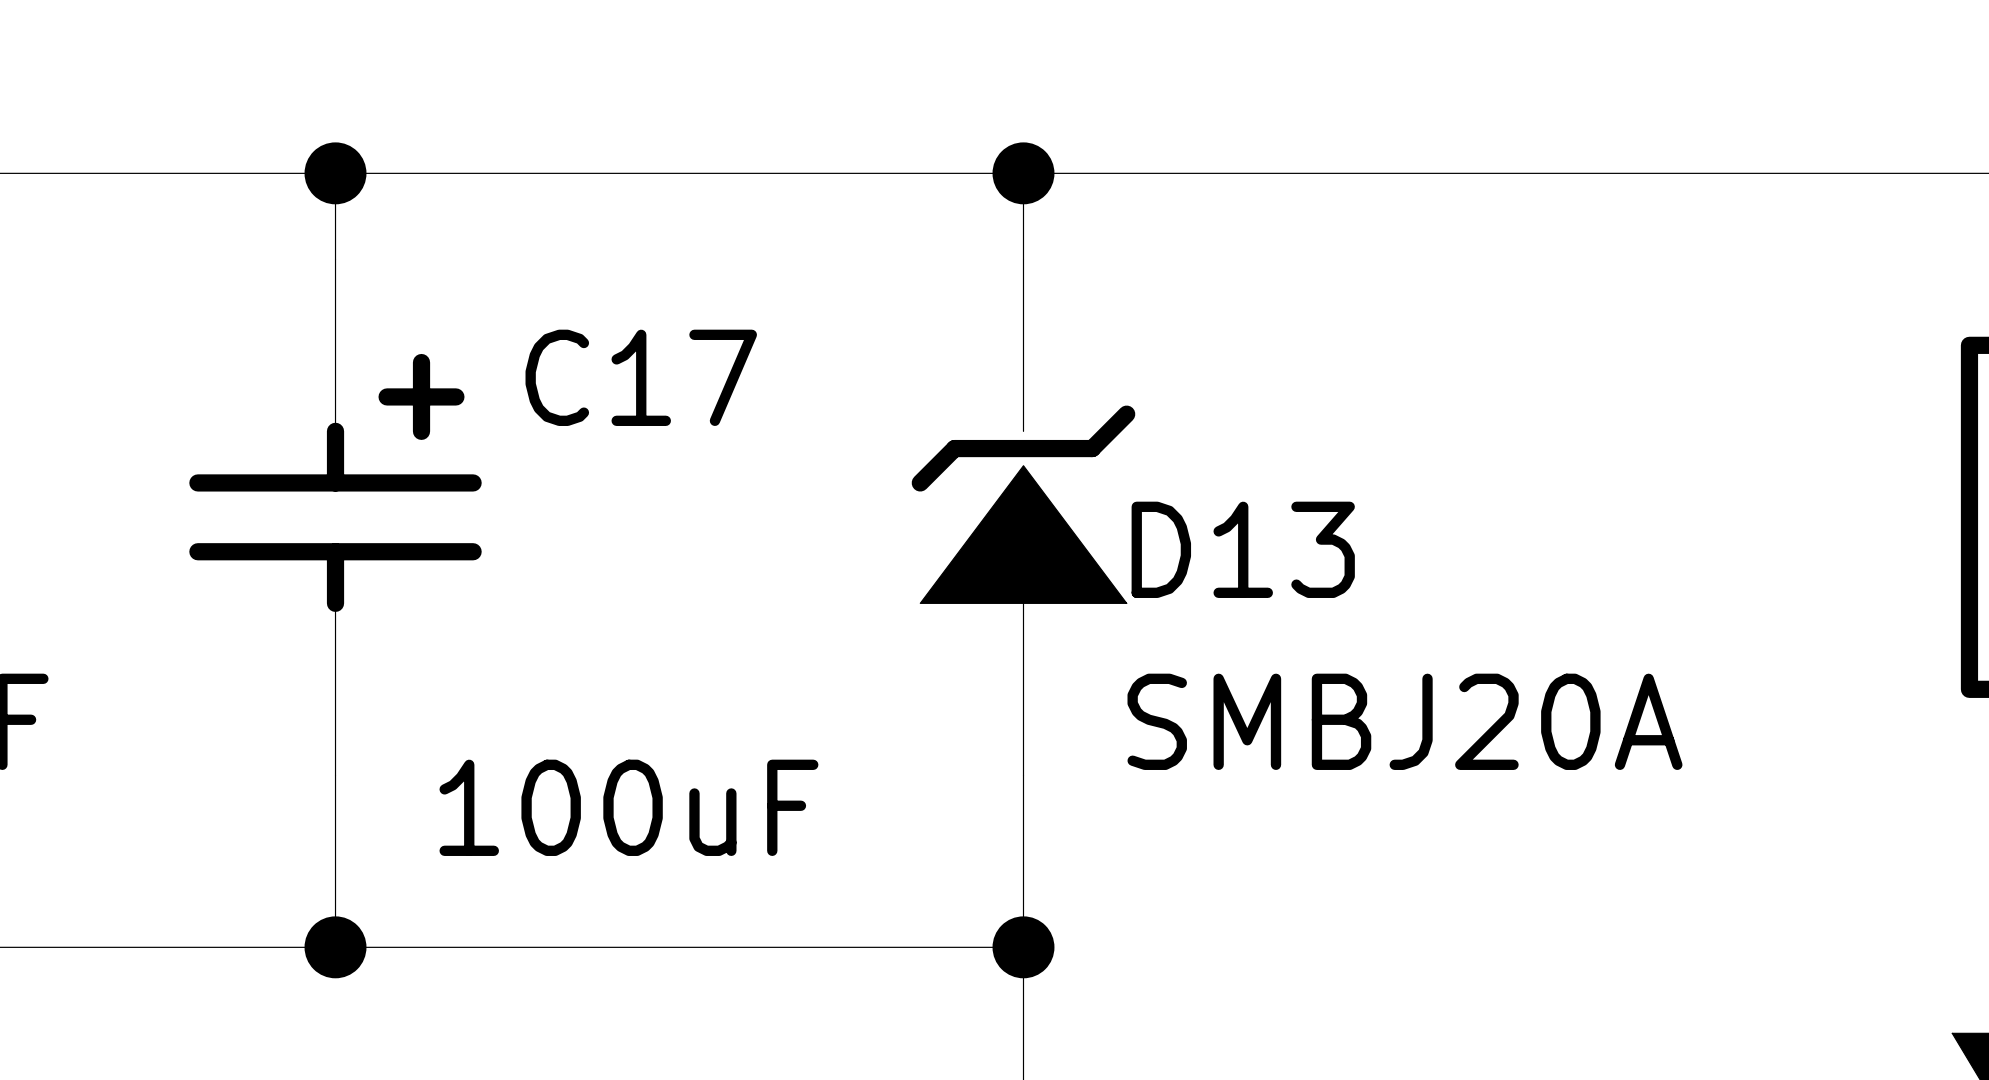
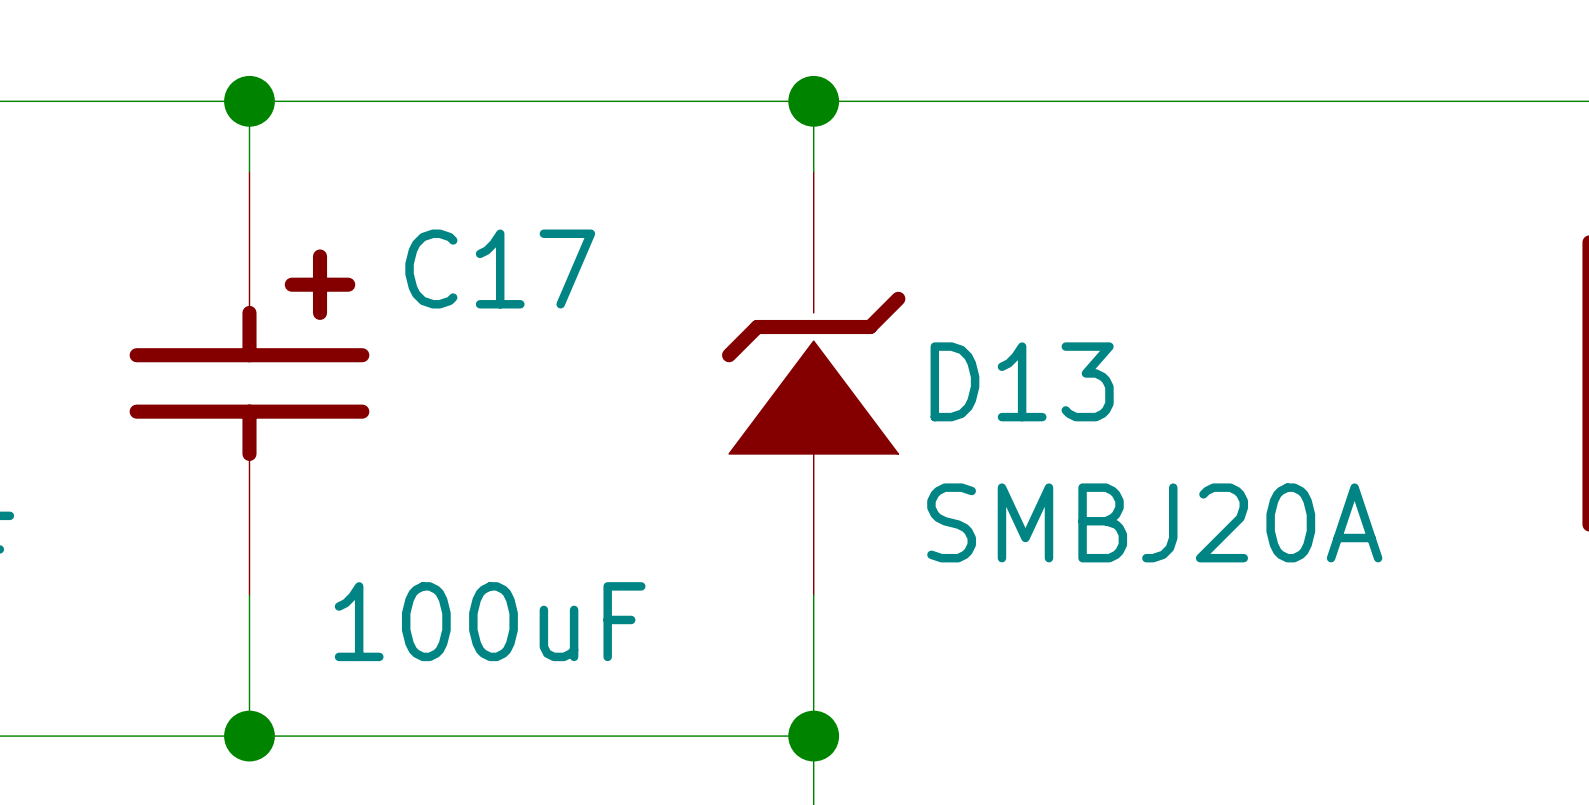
D13 name position: D13 (1243, 549) -> D13 (1022, 381)
D13 value position: SMBJ20A (1404, 721) -> SMBJ20A (1154, 522)

